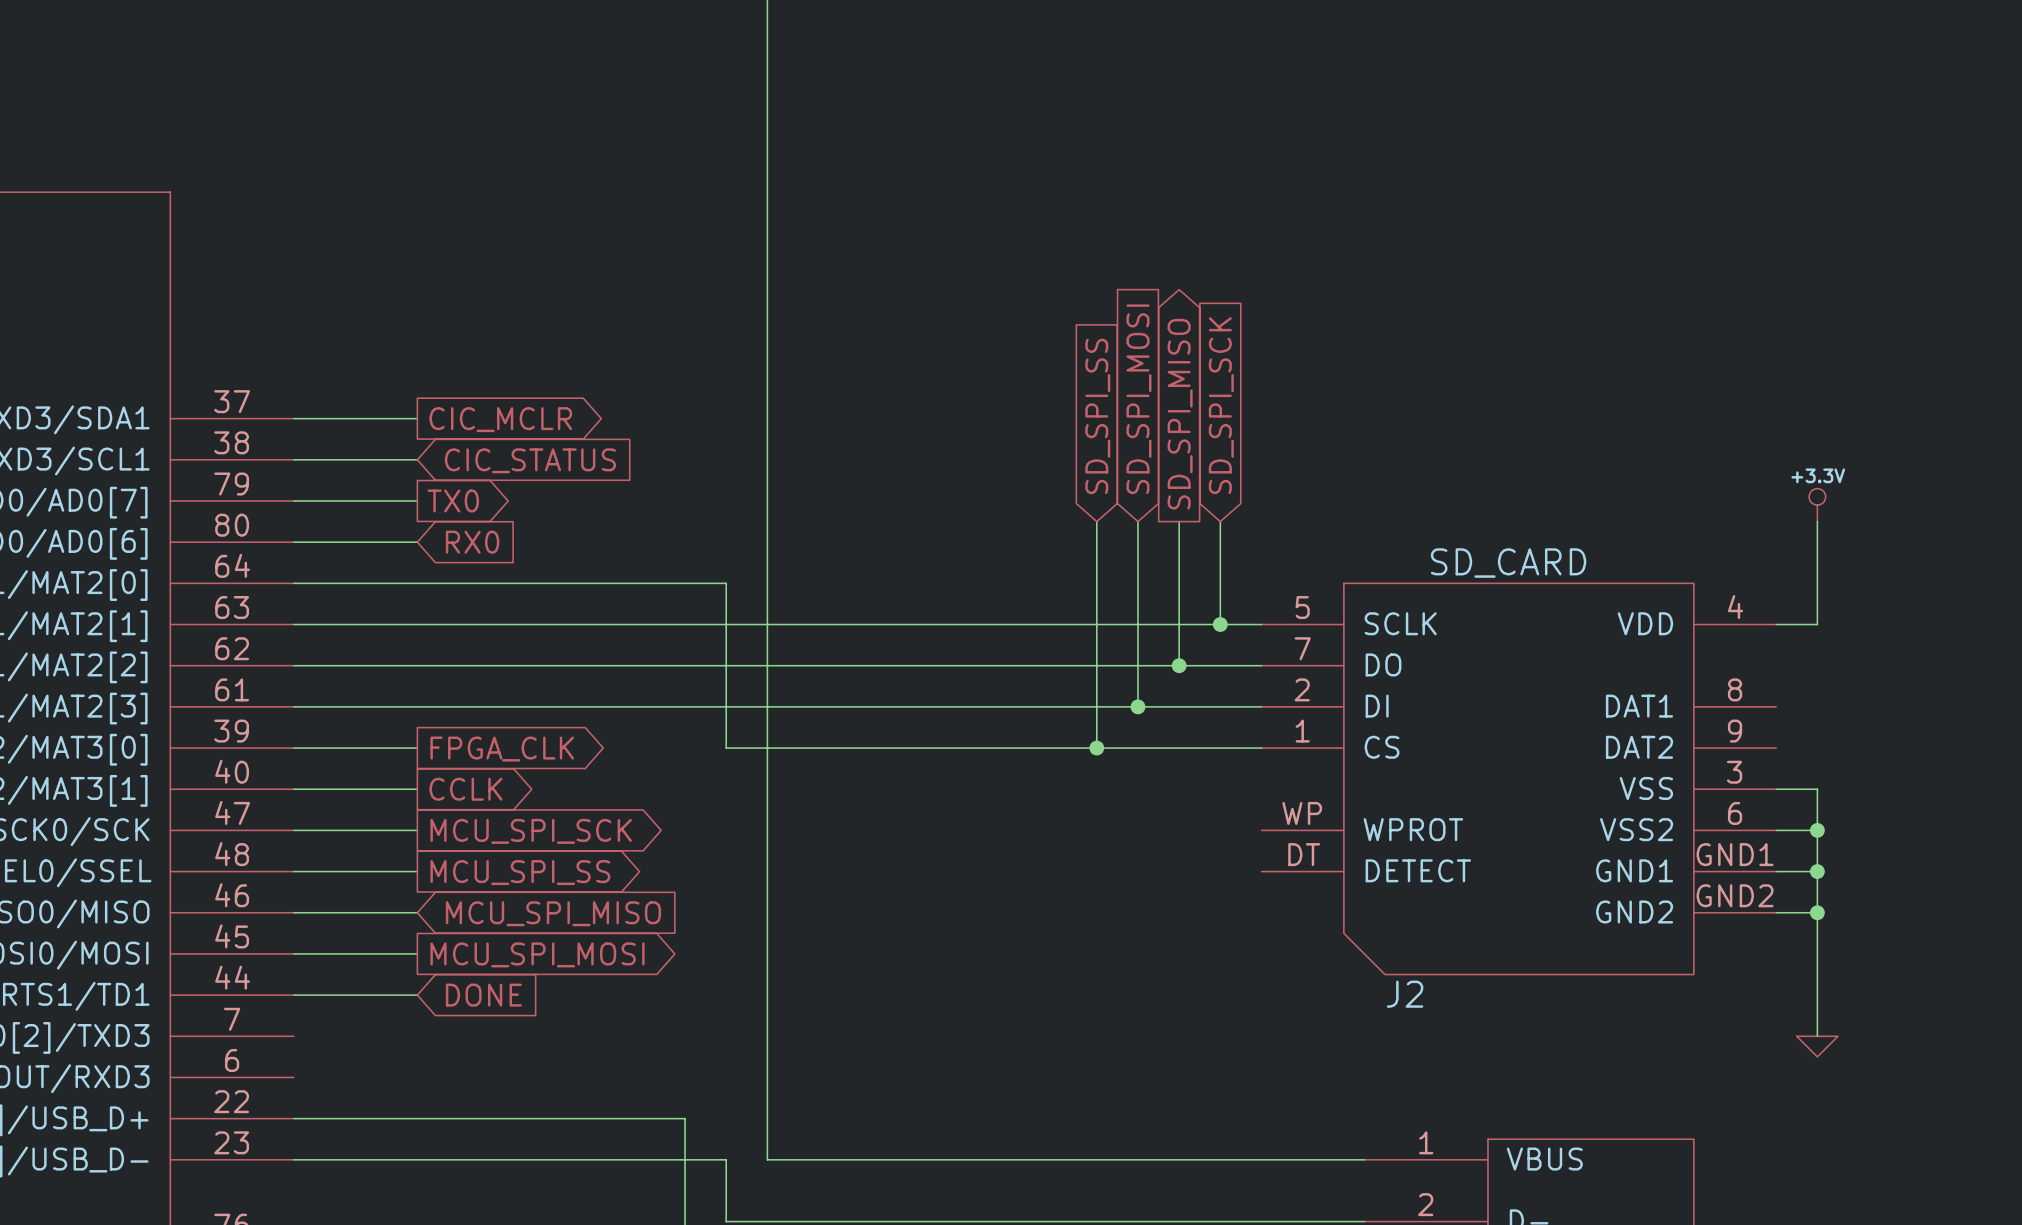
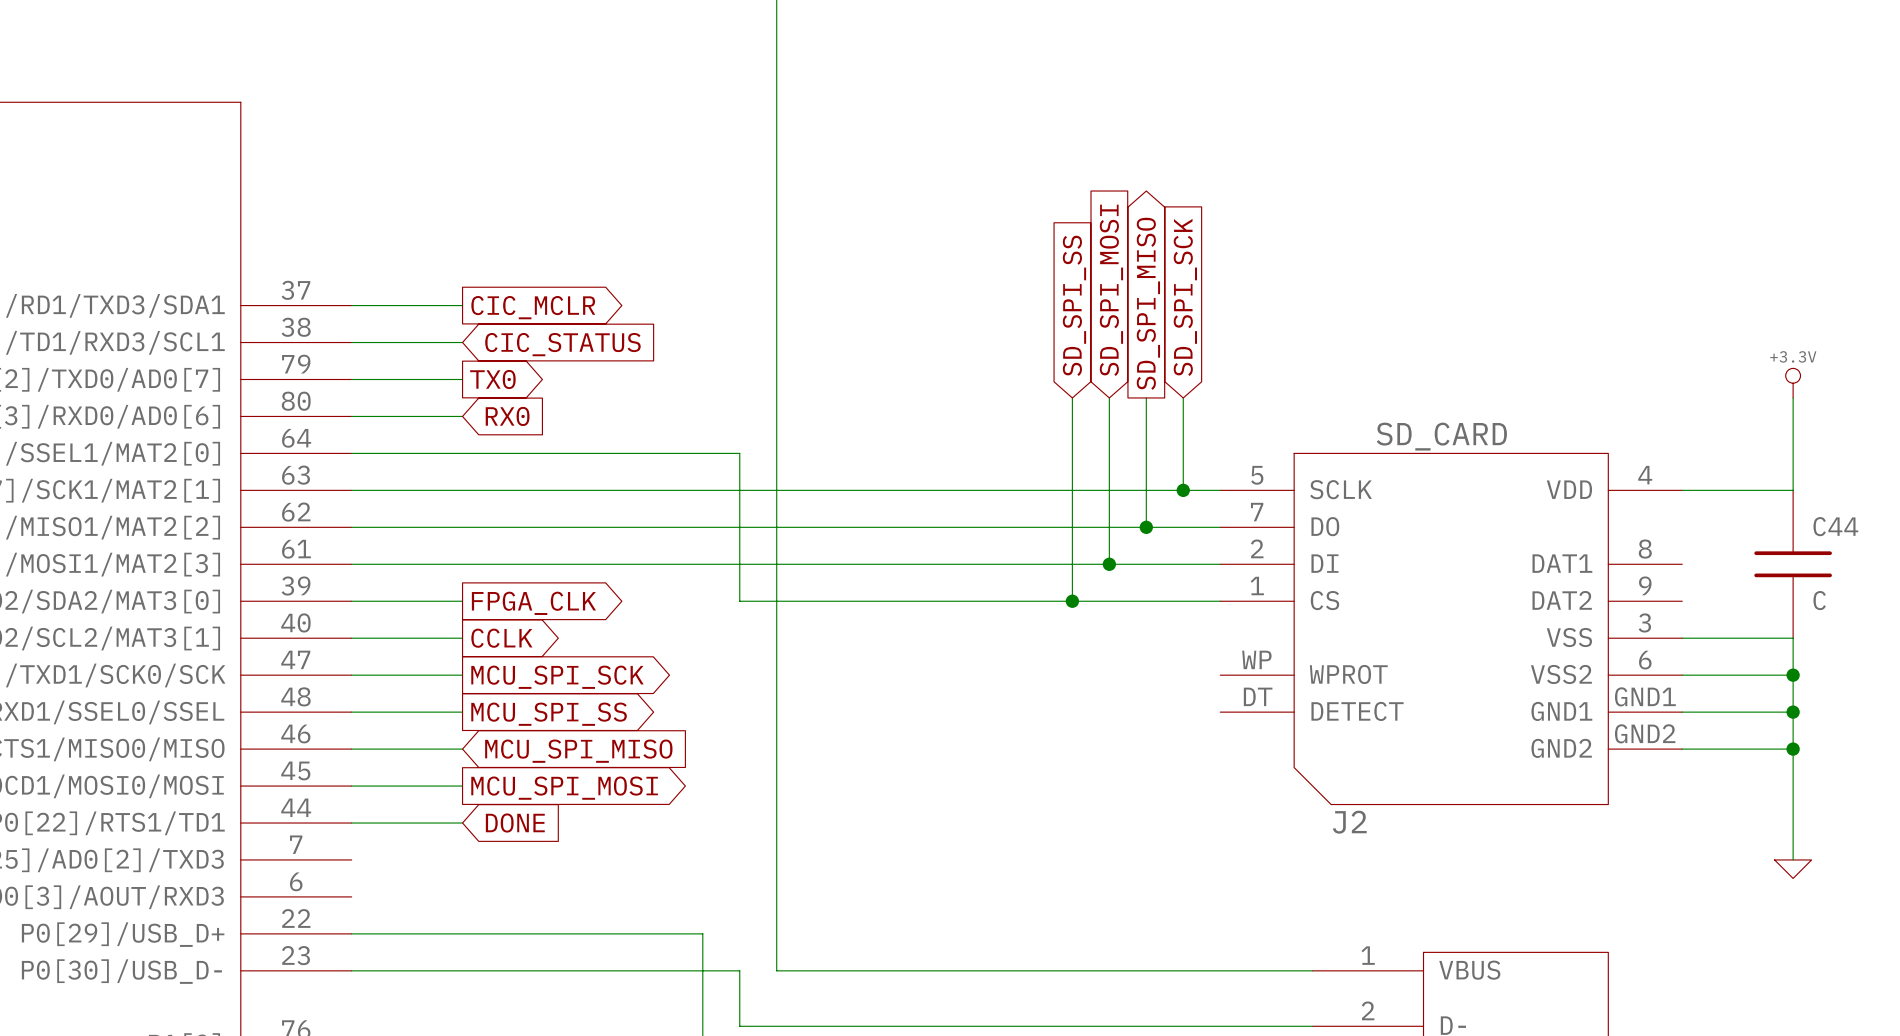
power symbol position: +3.3V (1817, 505) -> +3.3V (1793, 383)
wire: (1817, 521) (1817, 624) -> (1793, 397) (1793, 490) (1719, 490)
C44: none -> C (1793, 564)
wire: (1817, 789) (1817, 1036) -> (1719, 638) (1793, 638) (1793, 859)
wire: none -> (1719, 675) (1793, 675)
junction: (1817, 830) -> none
junction: none -> (1793, 675)
wire: none -> (1719, 712) (1793, 712)
junction: (1817, 871) -> none
junction: none -> (1793, 712)
wire: none -> (1719, 749) (1793, 749)
junction: (1817, 912) -> none
junction: none -> (1793, 749)
power symbol position: (1817, 1046) -> (1793, 869)

